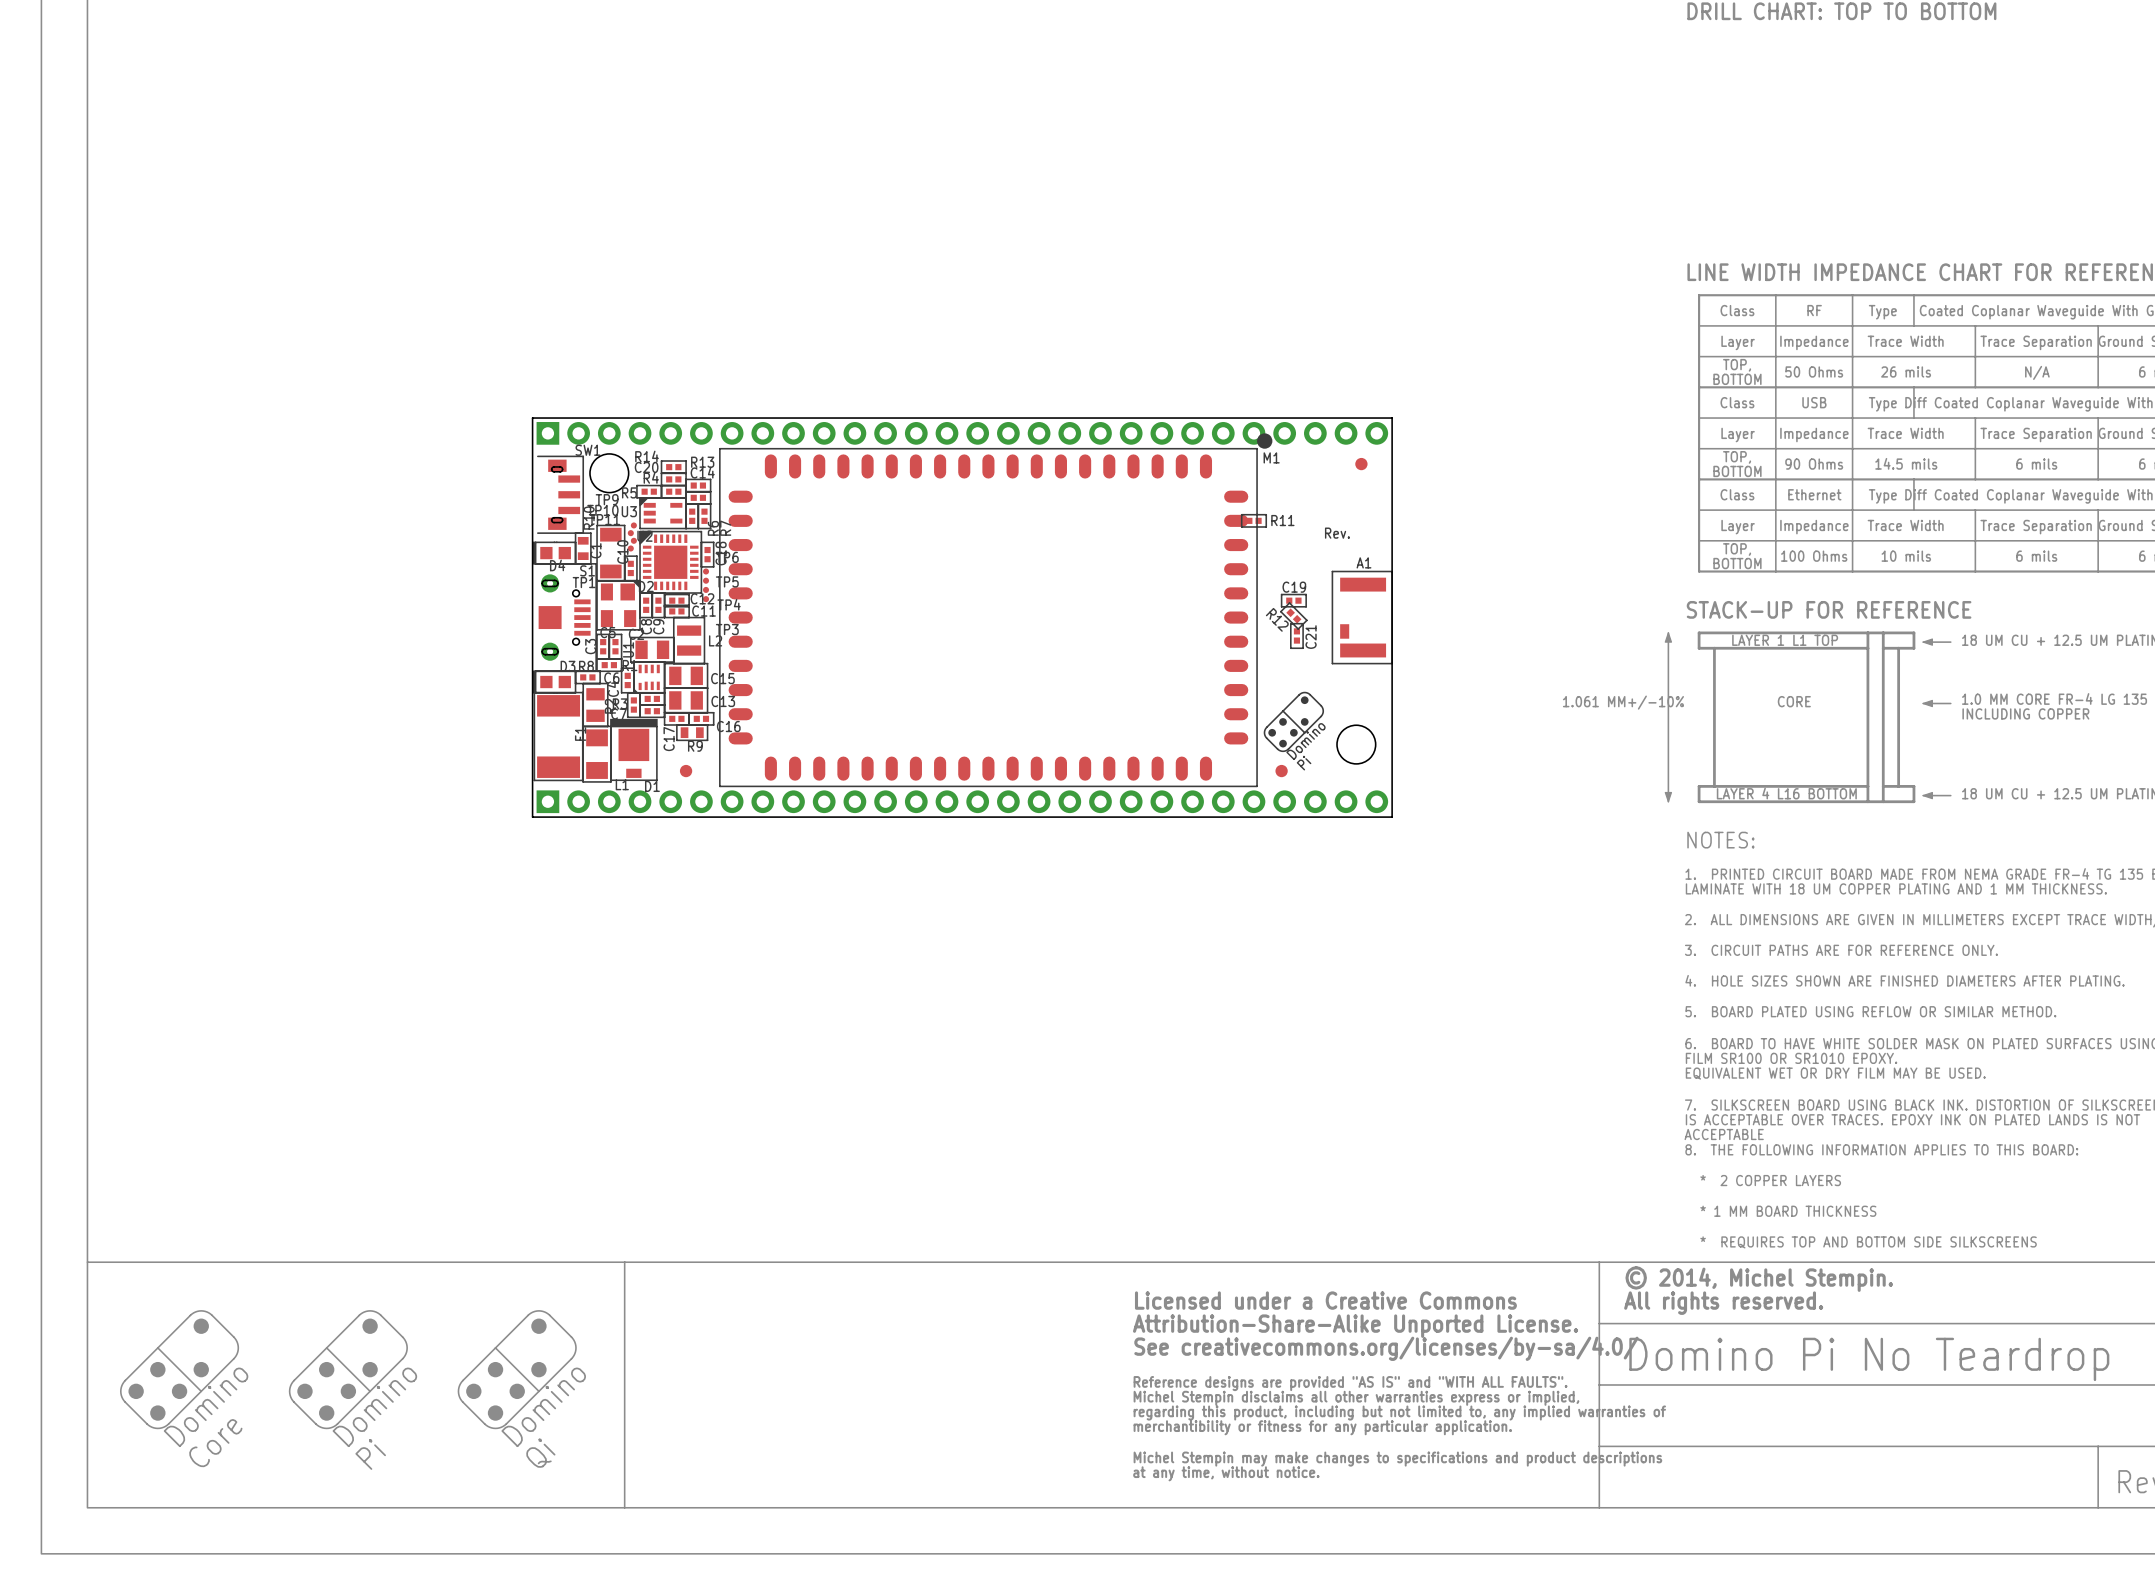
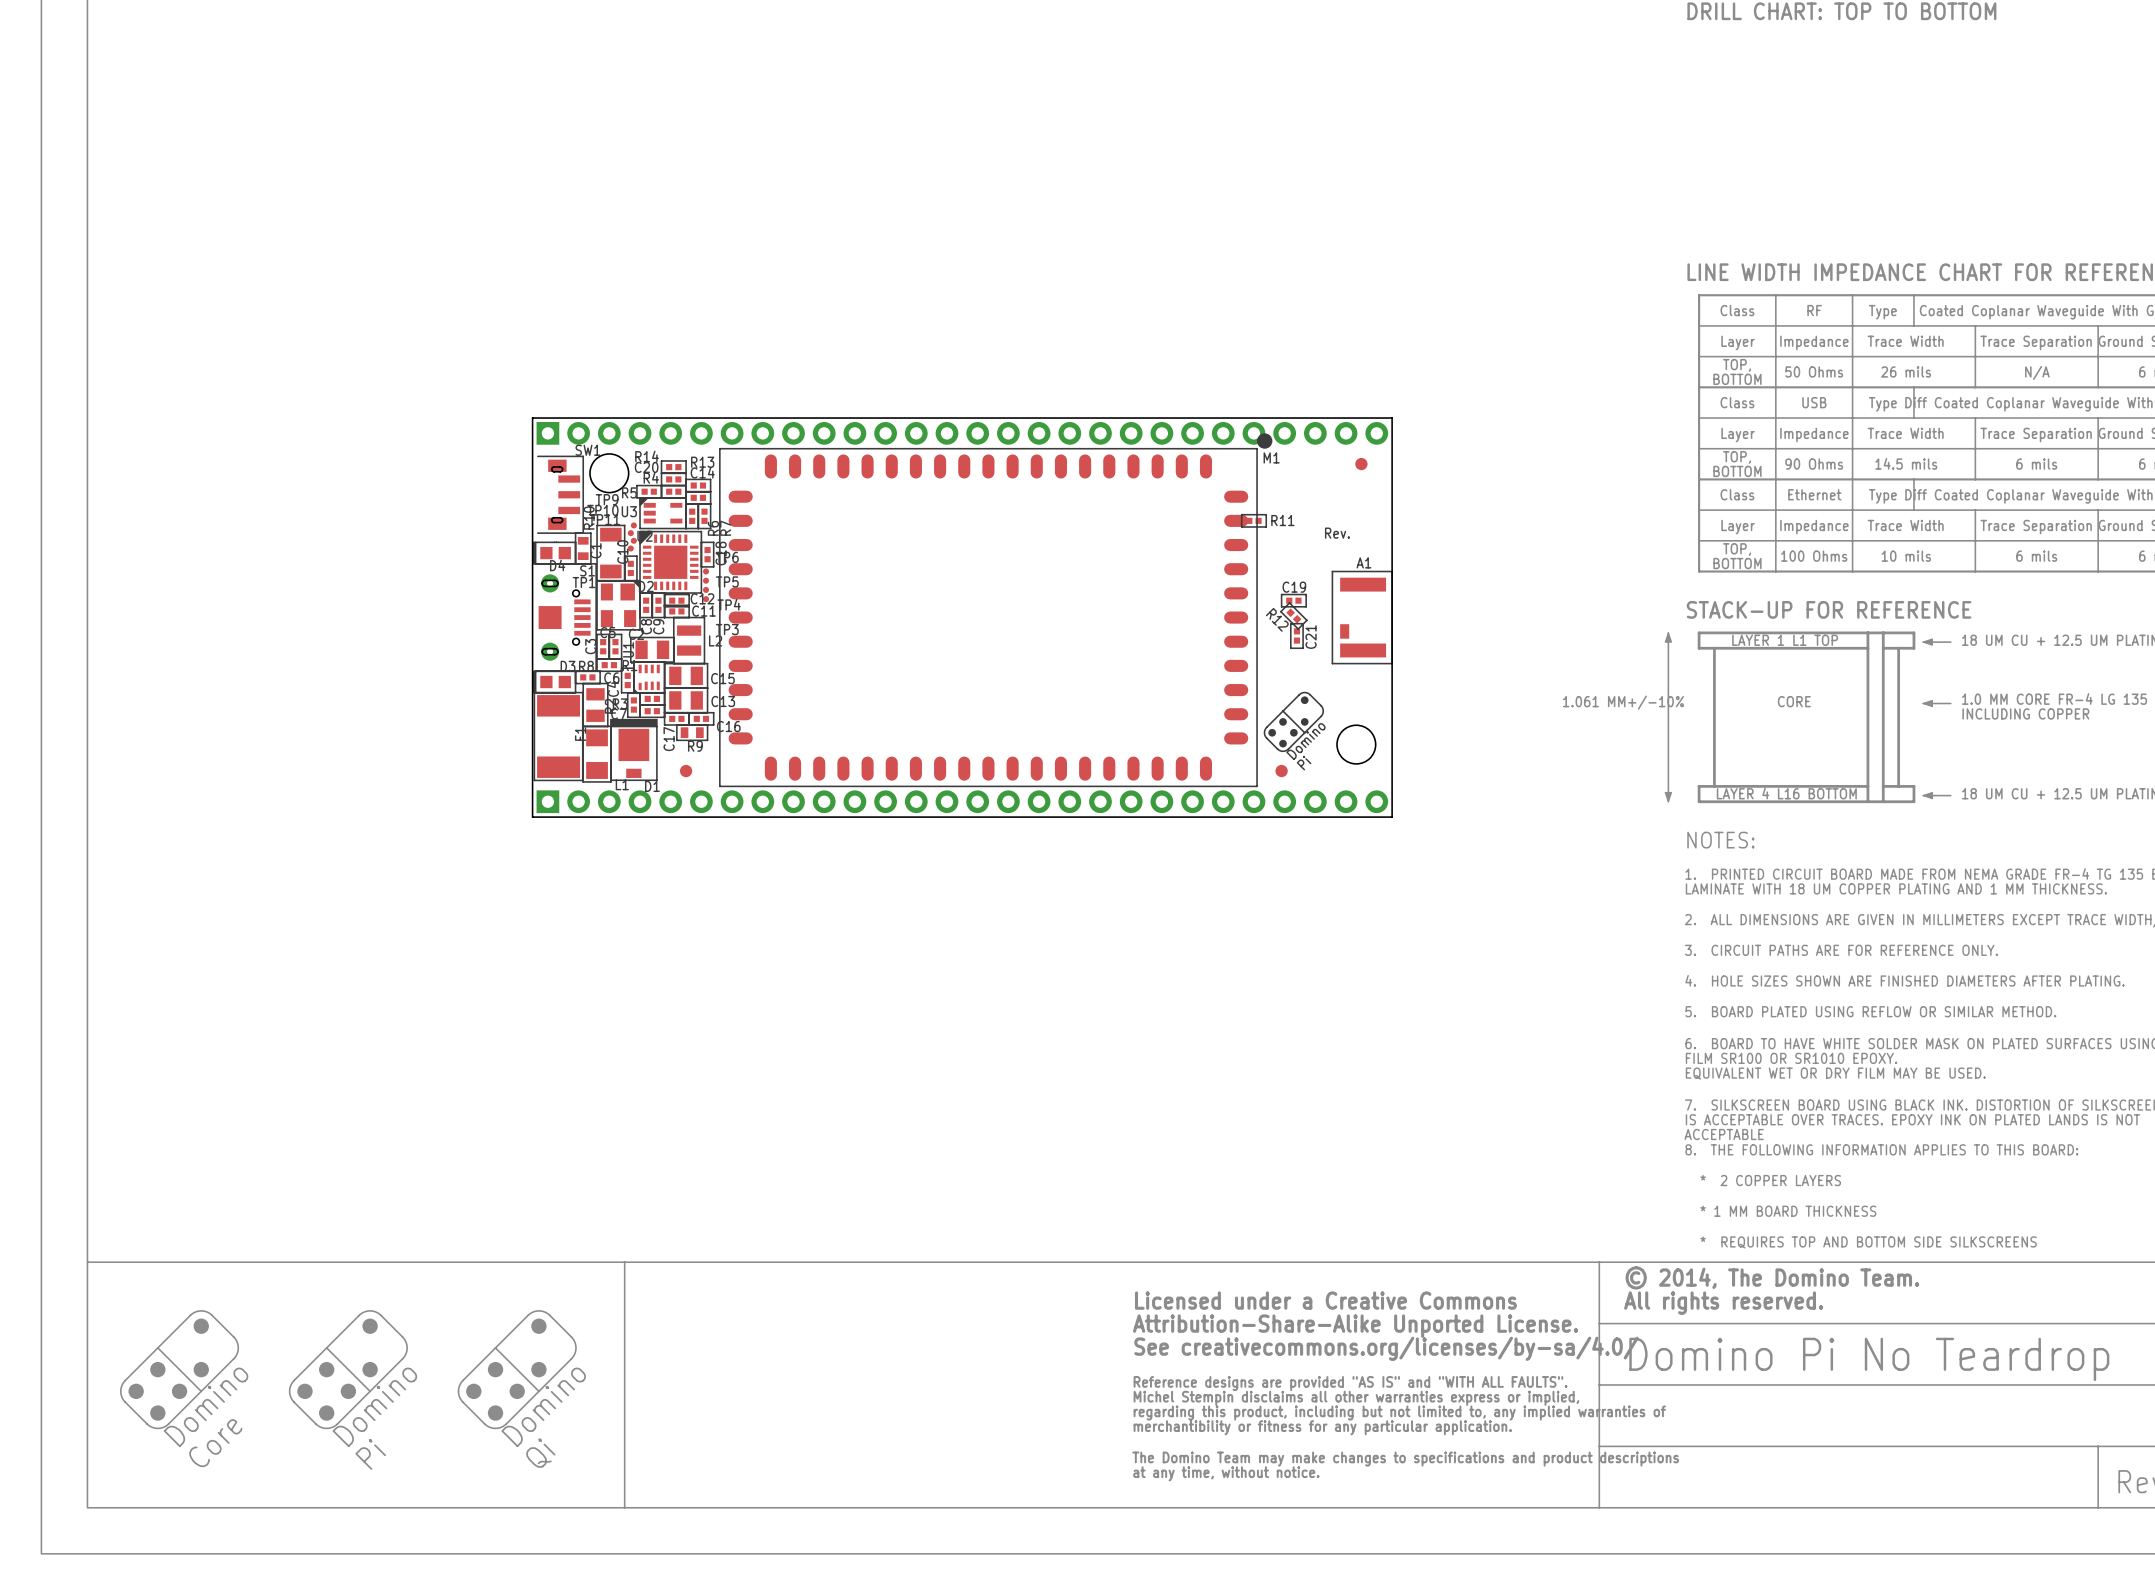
text: © 2014, Michel Stempin. (1759, 1279) -> © 2014, The Domino Team. (1772, 1277)
text: Michel Stempin may make changes to specifications and product descriptions (1397, 1459) -> The Domino Team may make changes to specifications and product descriptions (1405, 1459)

